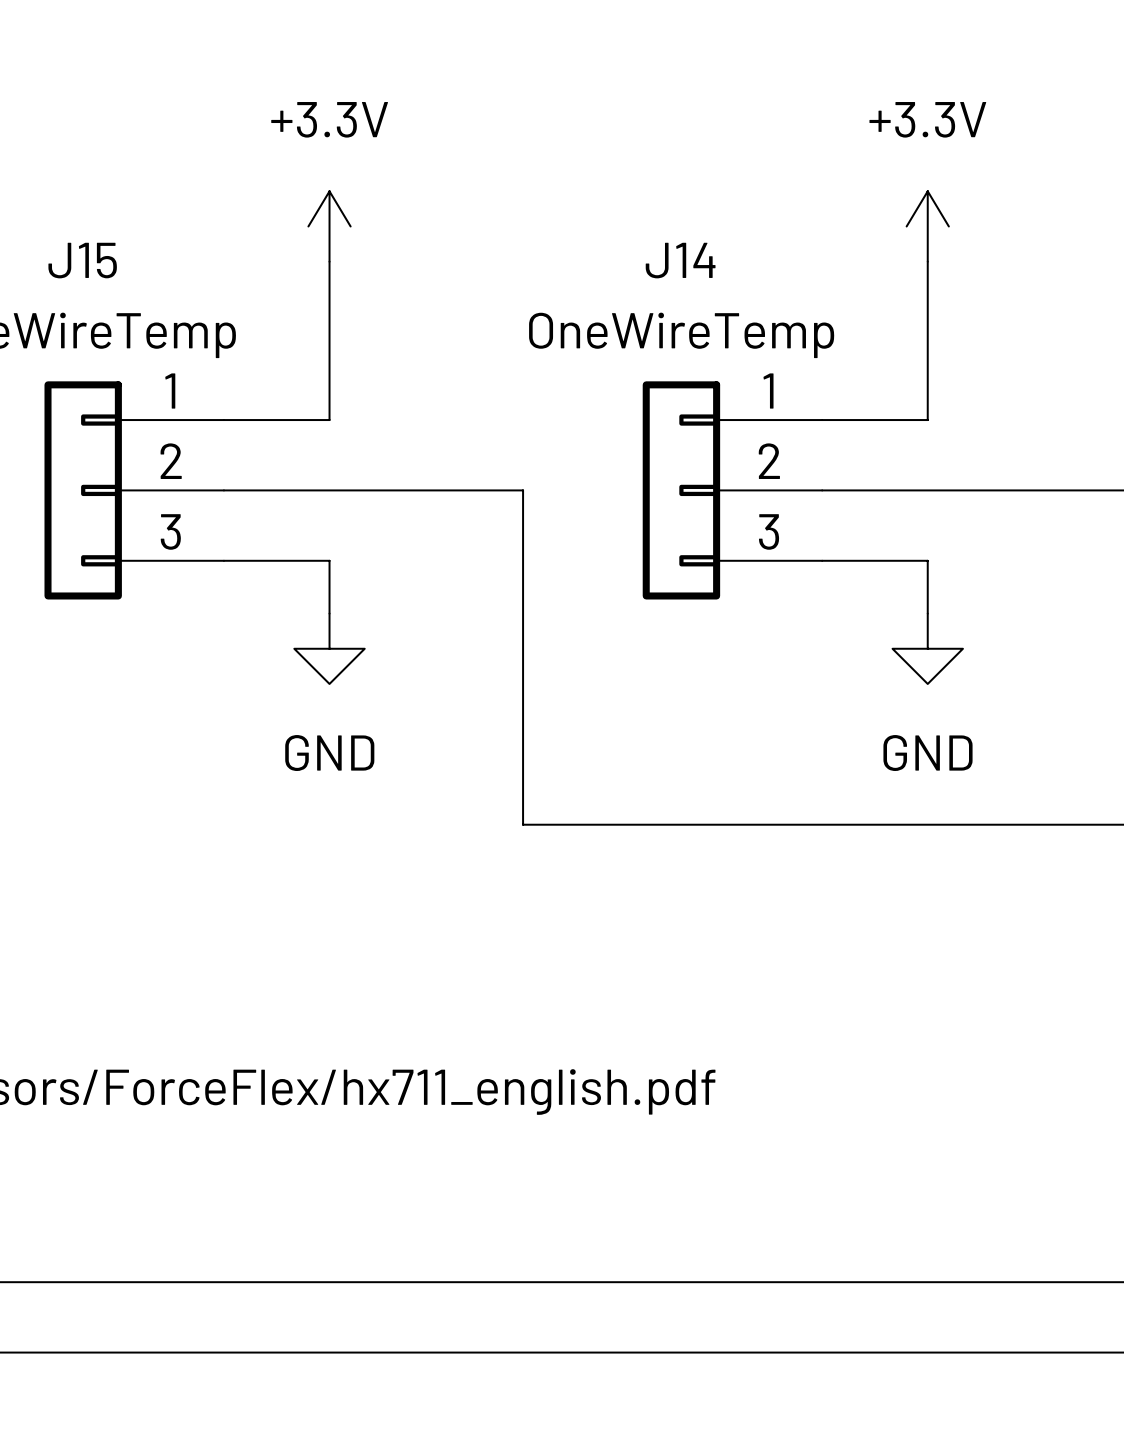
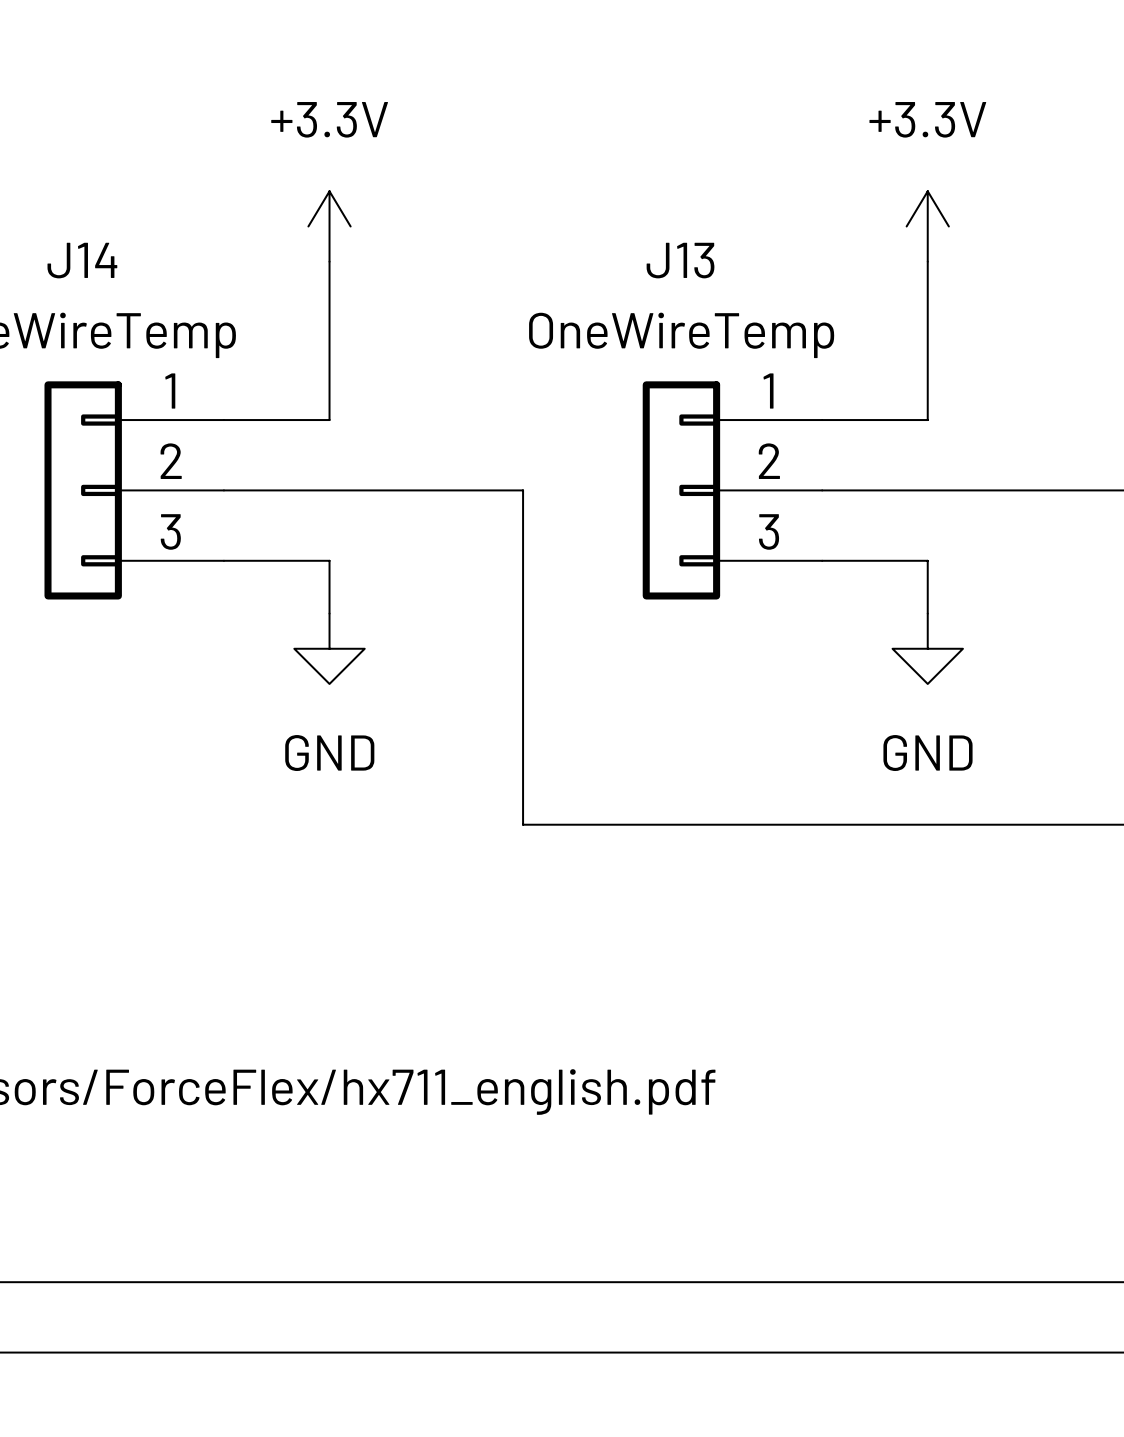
J15 name: J15 (82, 260) -> J14 (82, 260)
J14 name: J14 (680, 260) -> J13 (680, 260)

